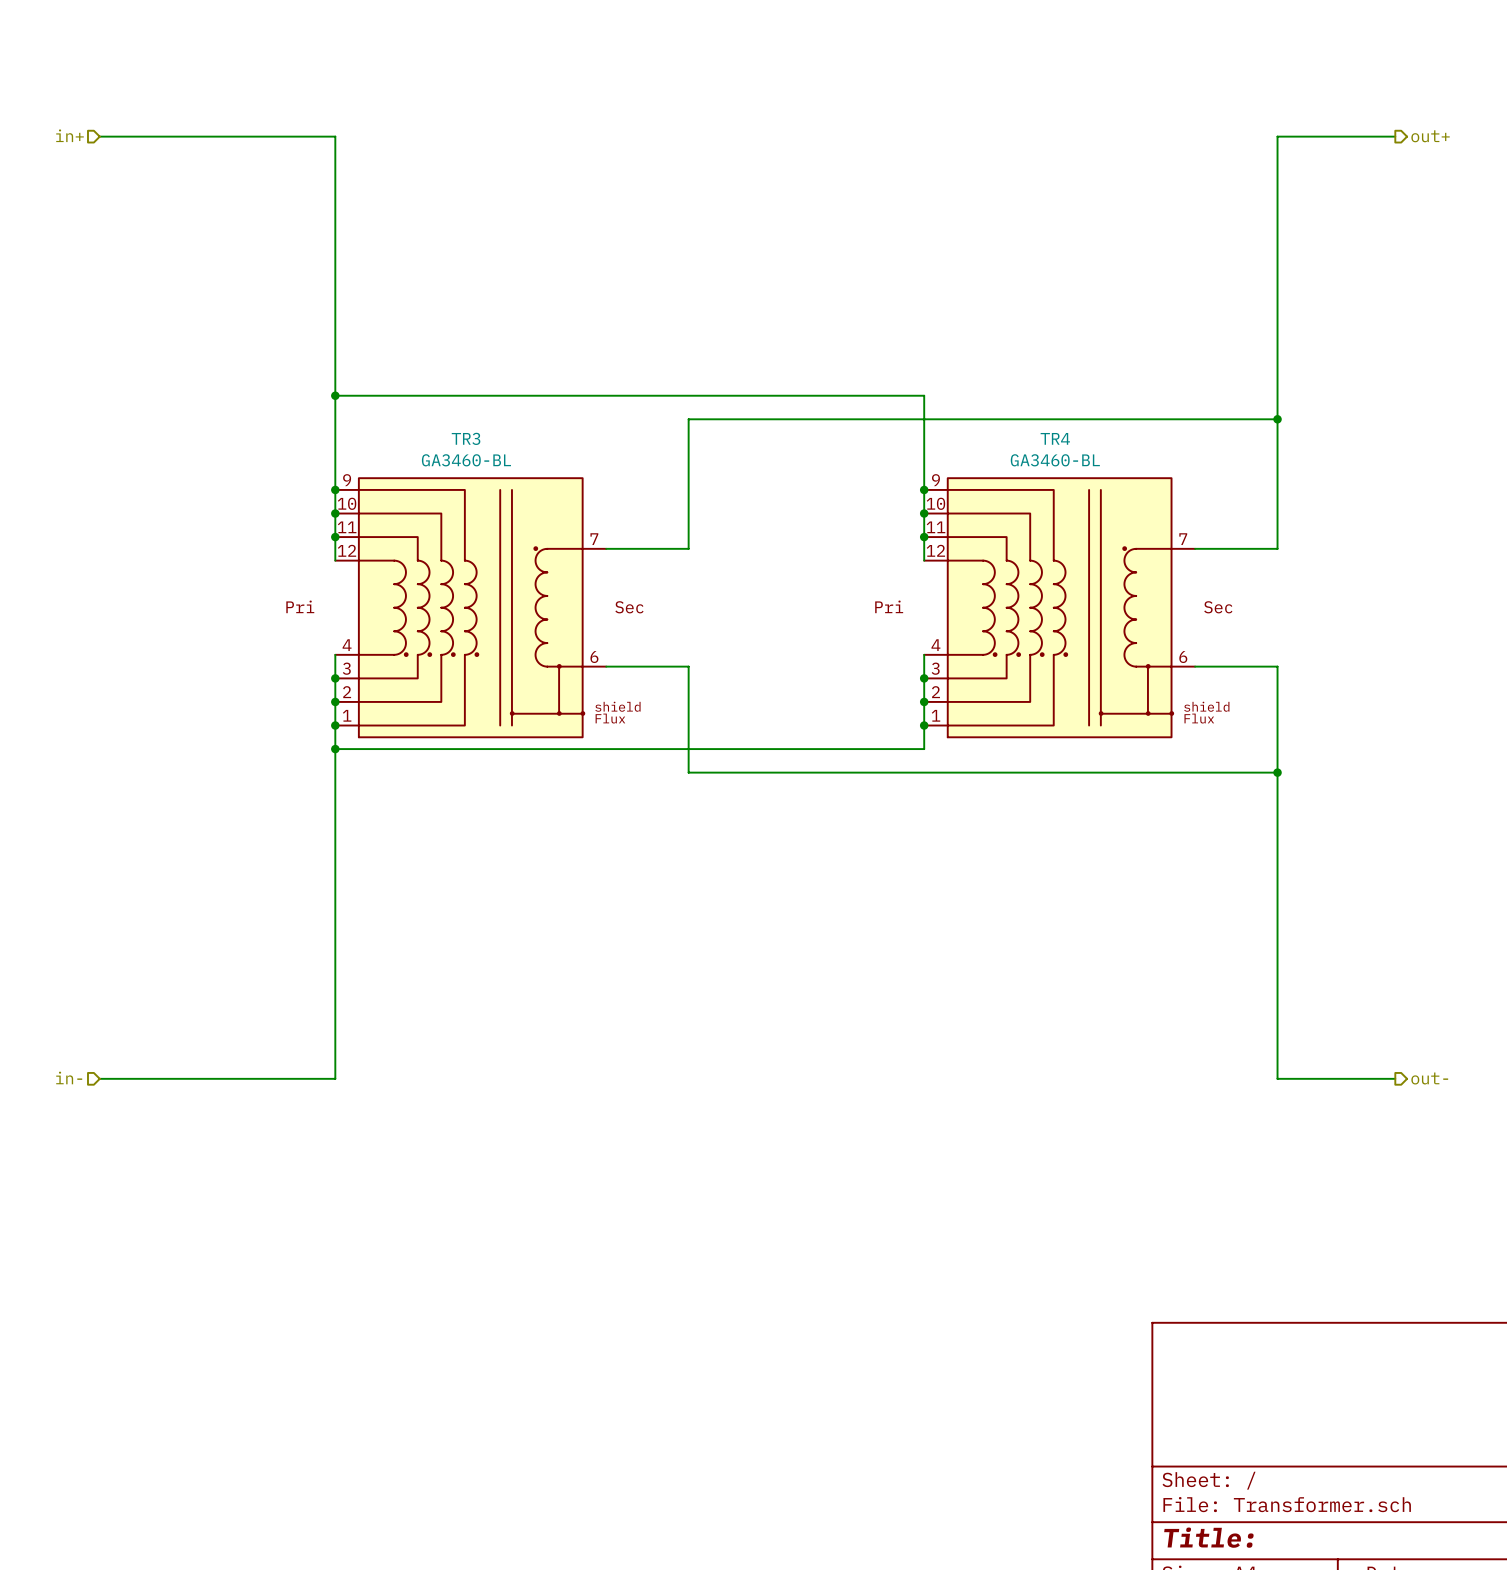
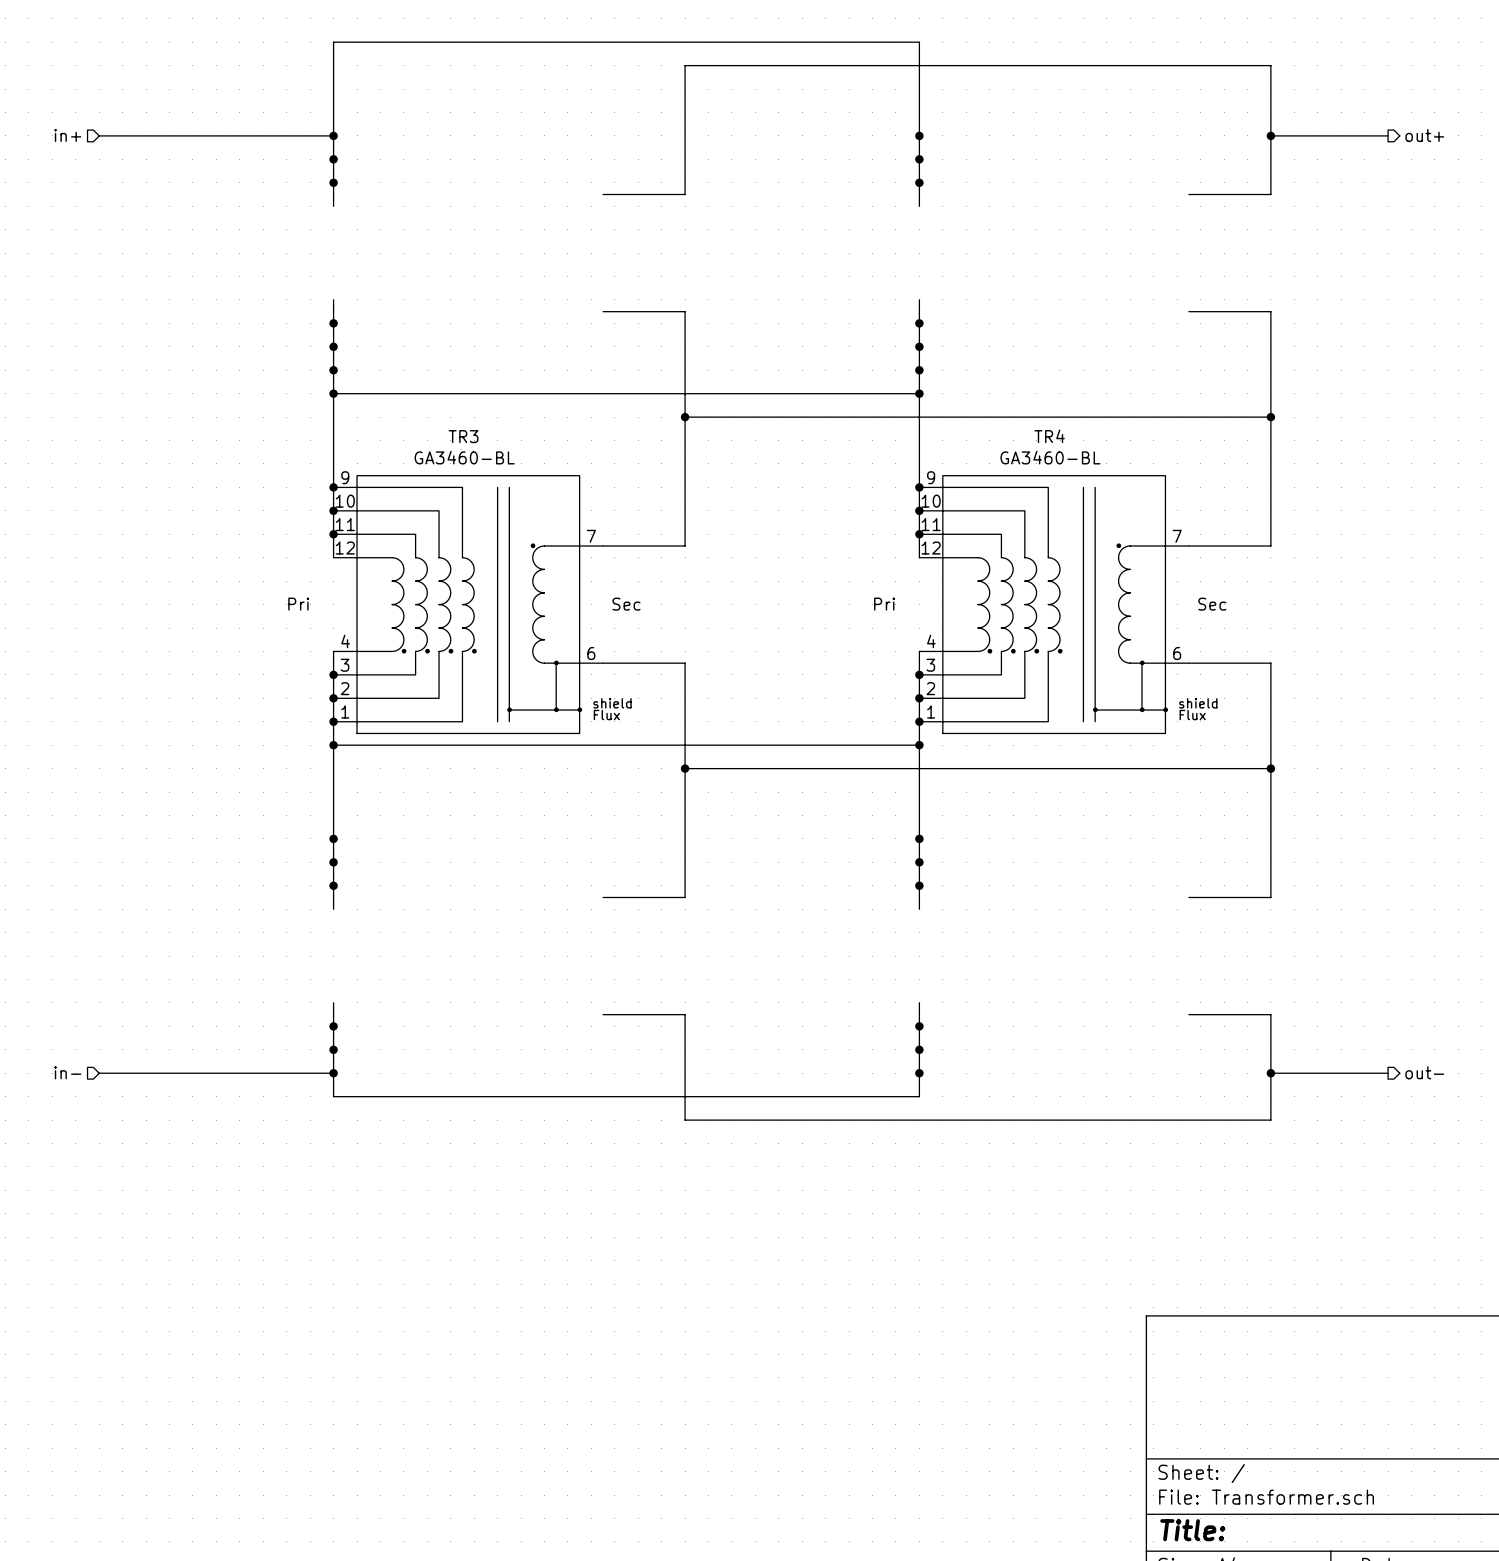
wire: none -> (333, 135) (333, 42) (919, 42) (919, 206)
junction: none -> (333, 135)
junction: none -> (919, 135)
wire: none -> (1270, 135) (1270, 65) (685, 65) (685, 194) (603, 194)
junction: none -> (1270, 135)
junction: none -> (333, 159)
junction: none -> (919, 159)
junction: none -> (333, 182)
junction: none -> (919, 182)
wire: (1277, 195) (1277, 313) -> (1270, 194) (1188, 194)
wire: (335, 207) (335, 301) -> none
wire: none -> (919, 299) (919, 393)
wire: none -> (603, 311) (685, 311) (685, 417)
wire: none -> (1188, 311) (1270, 311)
junction: none -> (333, 323)
junction: none -> (919, 323)
junction: none -> (333, 346)
junction: none -> (919, 346)
junction: none -> (333, 370)
junction: none -> (919, 370)
junction: none -> (919, 393)
junction: none -> (685, 417)
wire: none -> (919, 745) (919, 909)
junction: none -> (919, 745)
wire: none -> (685, 768) (685, 897) (603, 897)
junction: none -> (685, 768)
junction: none -> (333, 838)
junction: none -> (919, 838)
junction: none -> (333, 862)
junction: none -> (919, 862)
junction: none -> (333, 885)
junction: none -> (919, 885)
wire: (1277, 902) (1277, 1019) -> (1270, 897) (1188, 897)
wire: (335, 913) (335, 1008) -> none
wire: none -> (919, 1002) (919, 1096) (333, 1096) (333, 1073)
wire: none -> (603, 1014) (685, 1014) (685, 1120) (1270, 1120) (1270, 1073)
wire: none -> (1188, 1014) (1270, 1014)
junction: none -> (333, 1026)
junction: none -> (919, 1026)
junction: none -> (333, 1049)
junction: none -> (919, 1049)
junction: none -> (333, 1073)
junction: none -> (919, 1073)
junction: none -> (1270, 1073)

